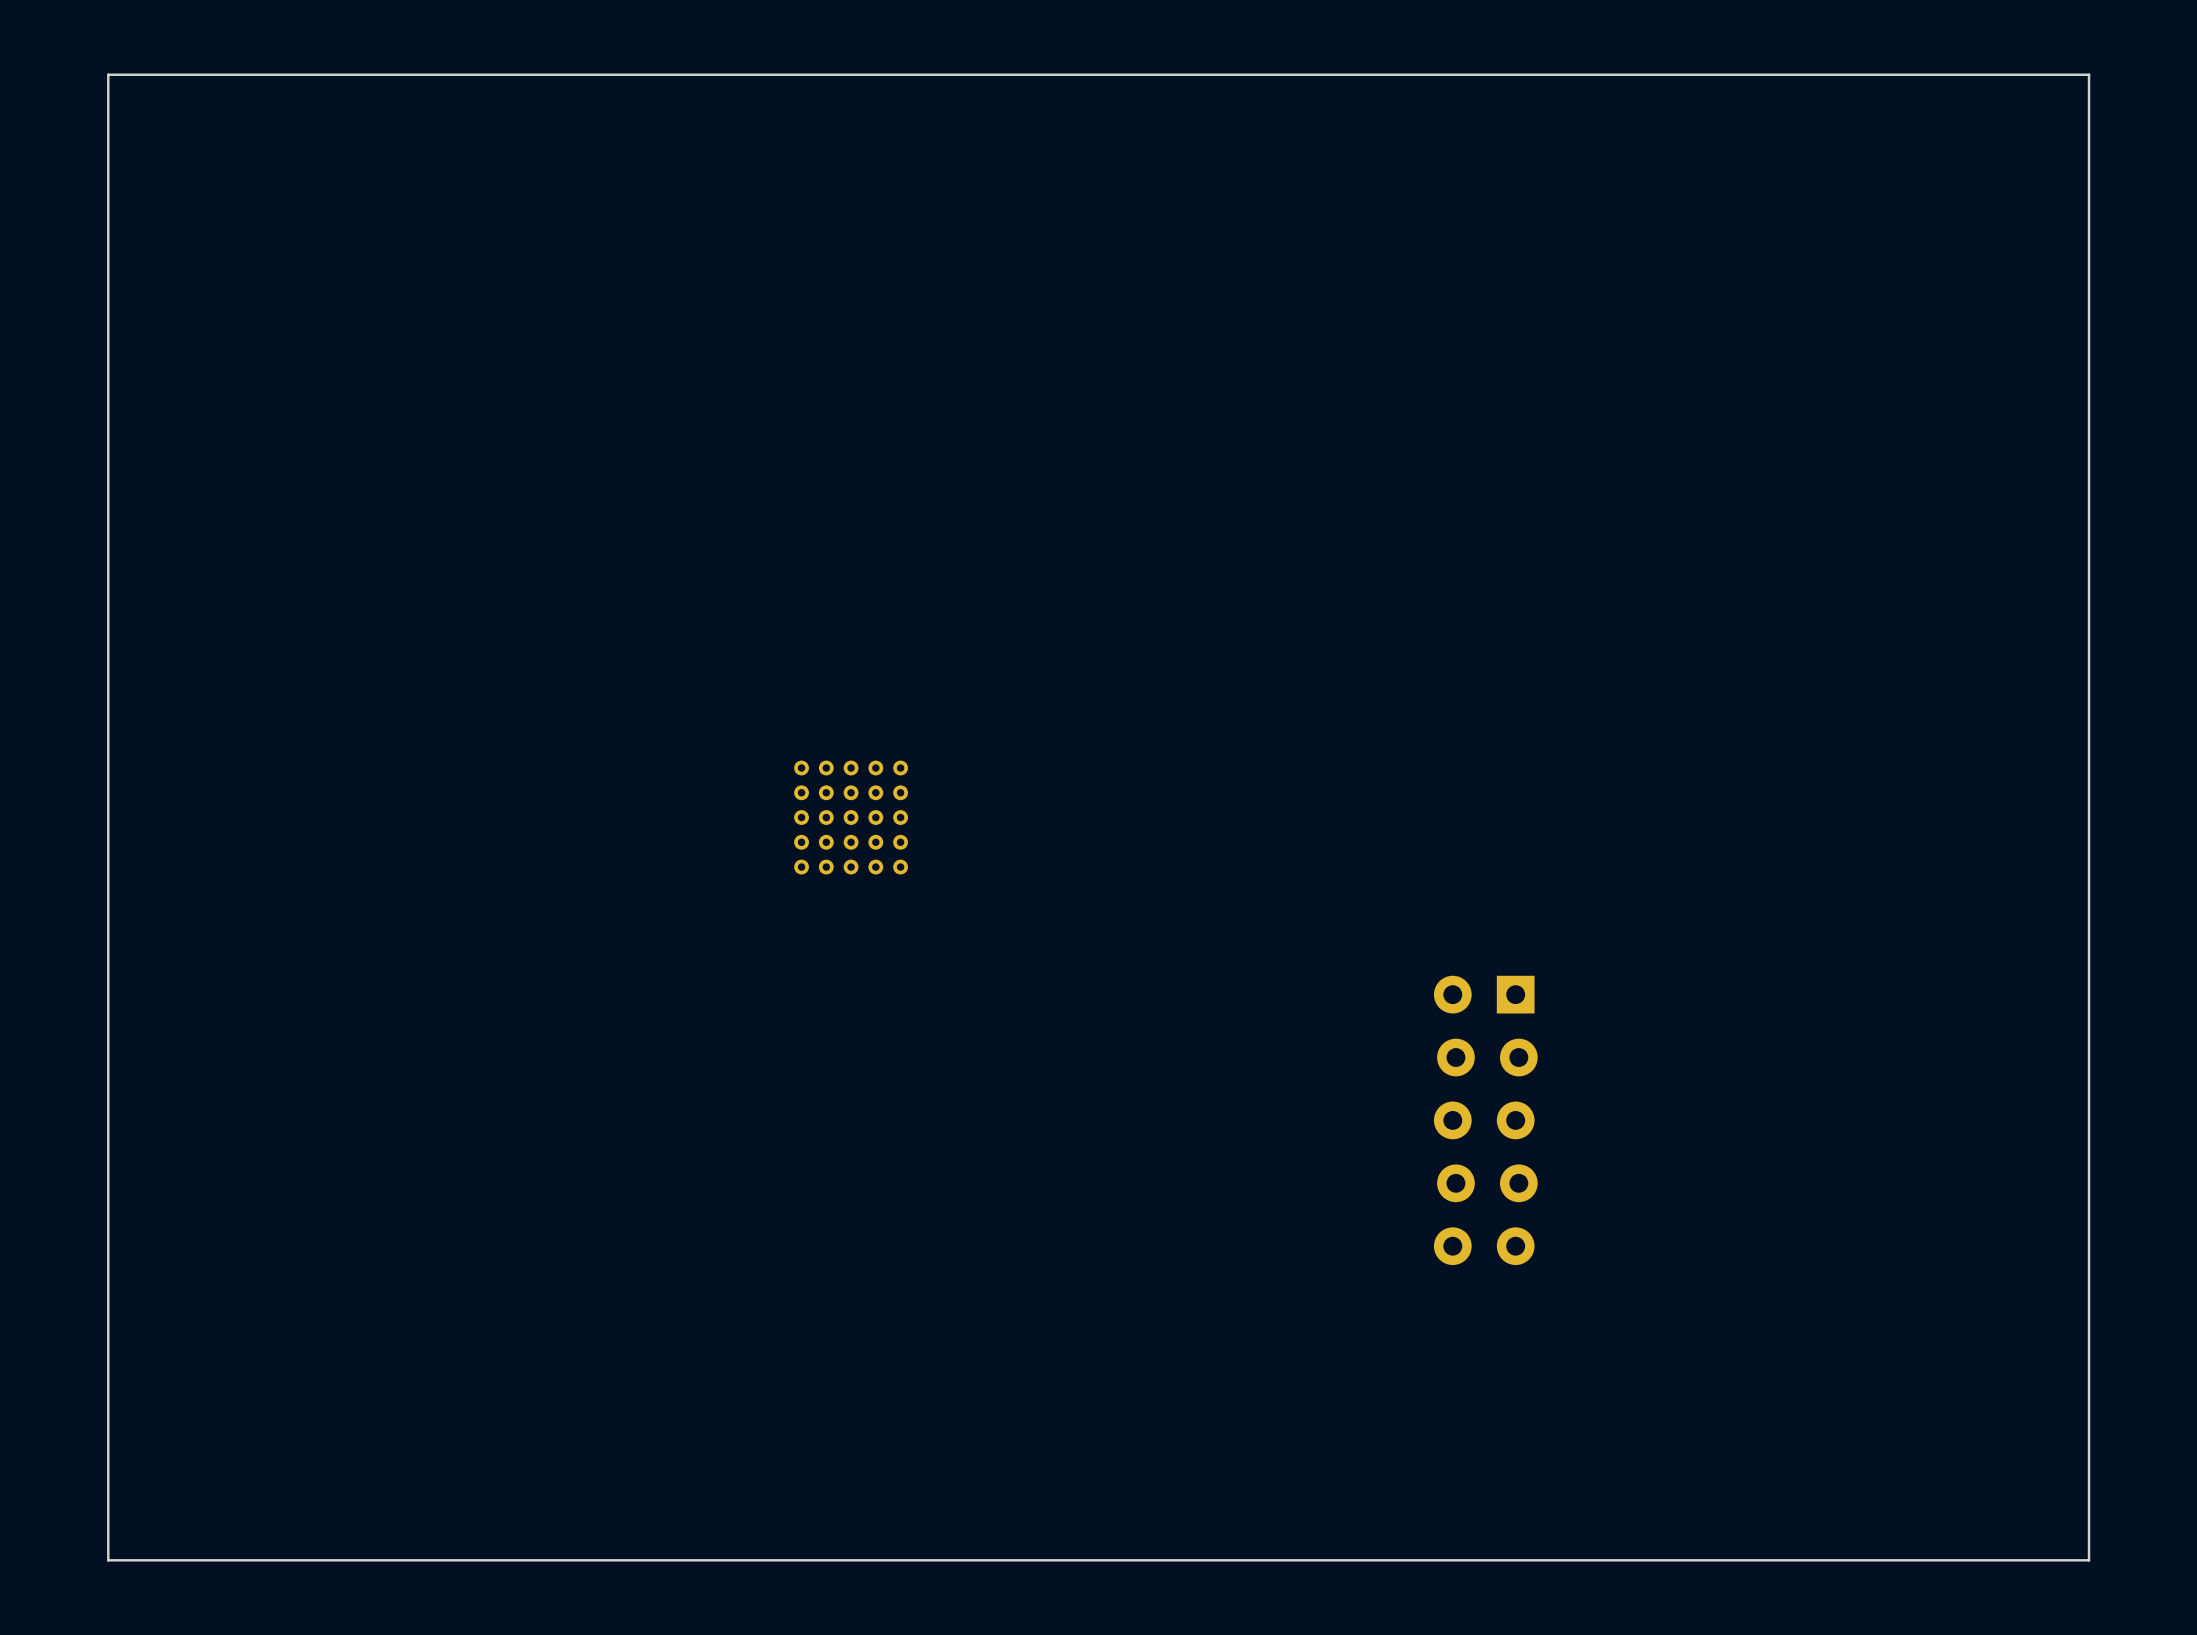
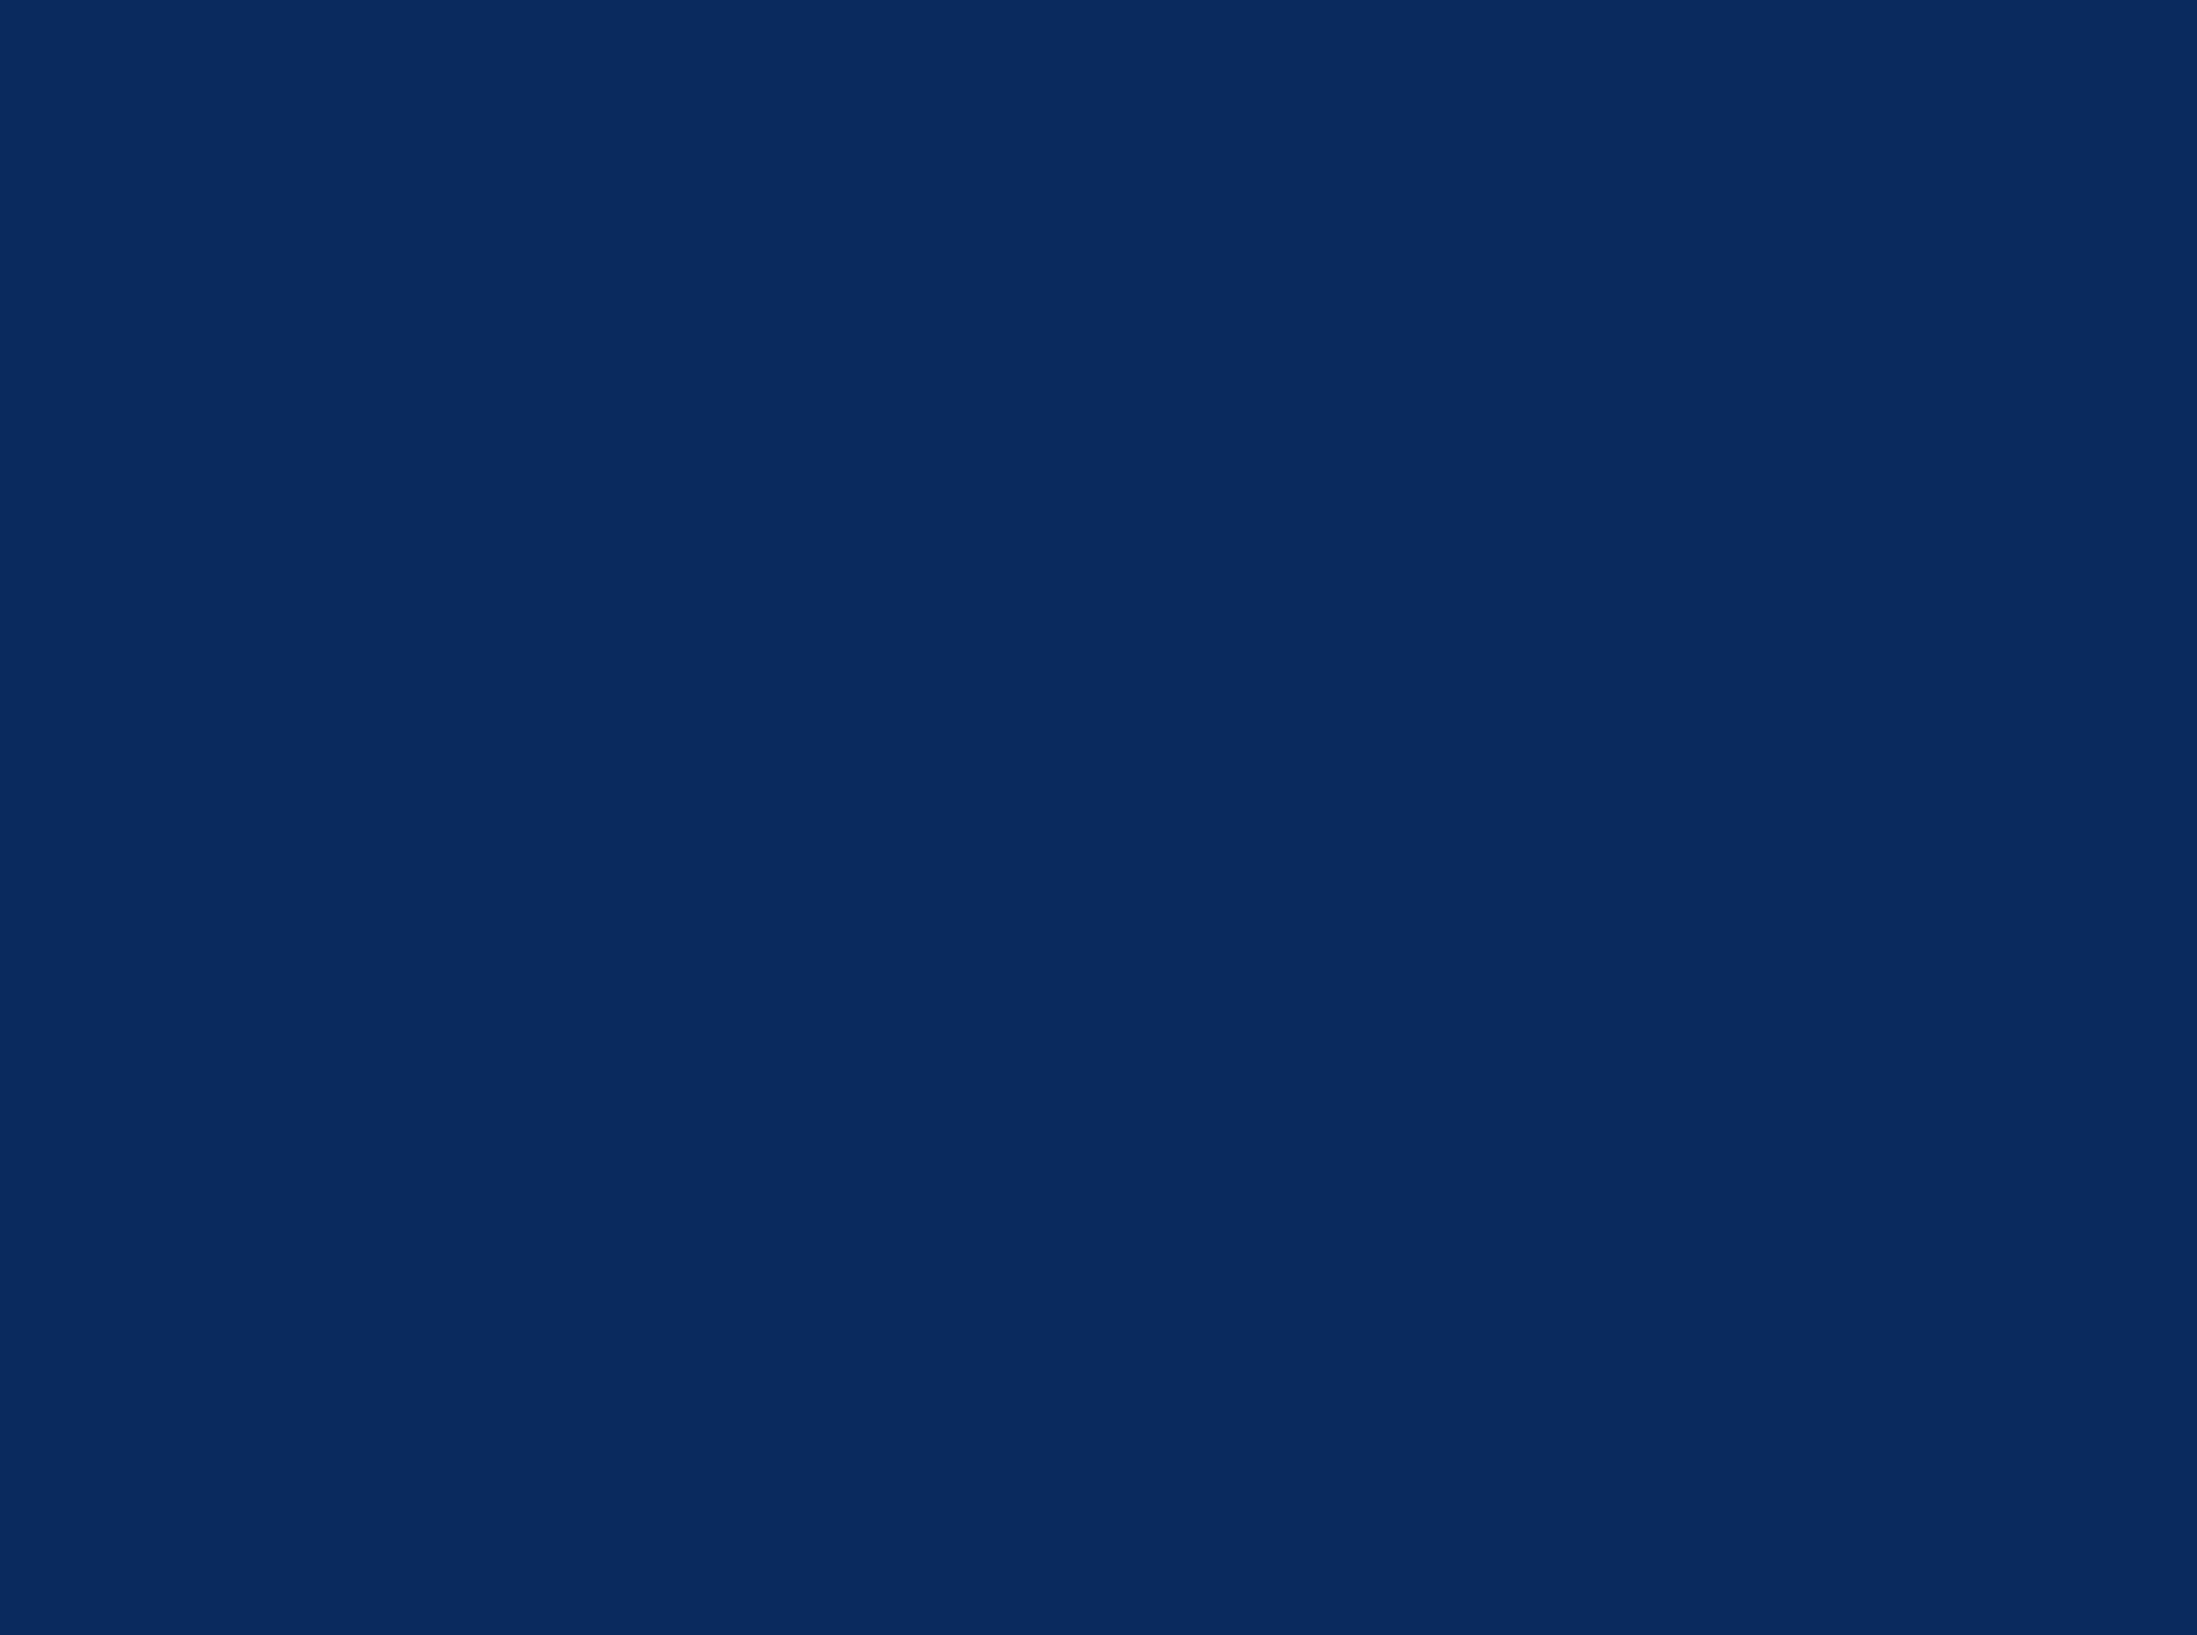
board edge: (2089, 74) (108, 74) (108, 1560) (2089, 1560) (2089, 74) -> none
part: (851, 817) -> none
part: (1485, 1120) -> none

